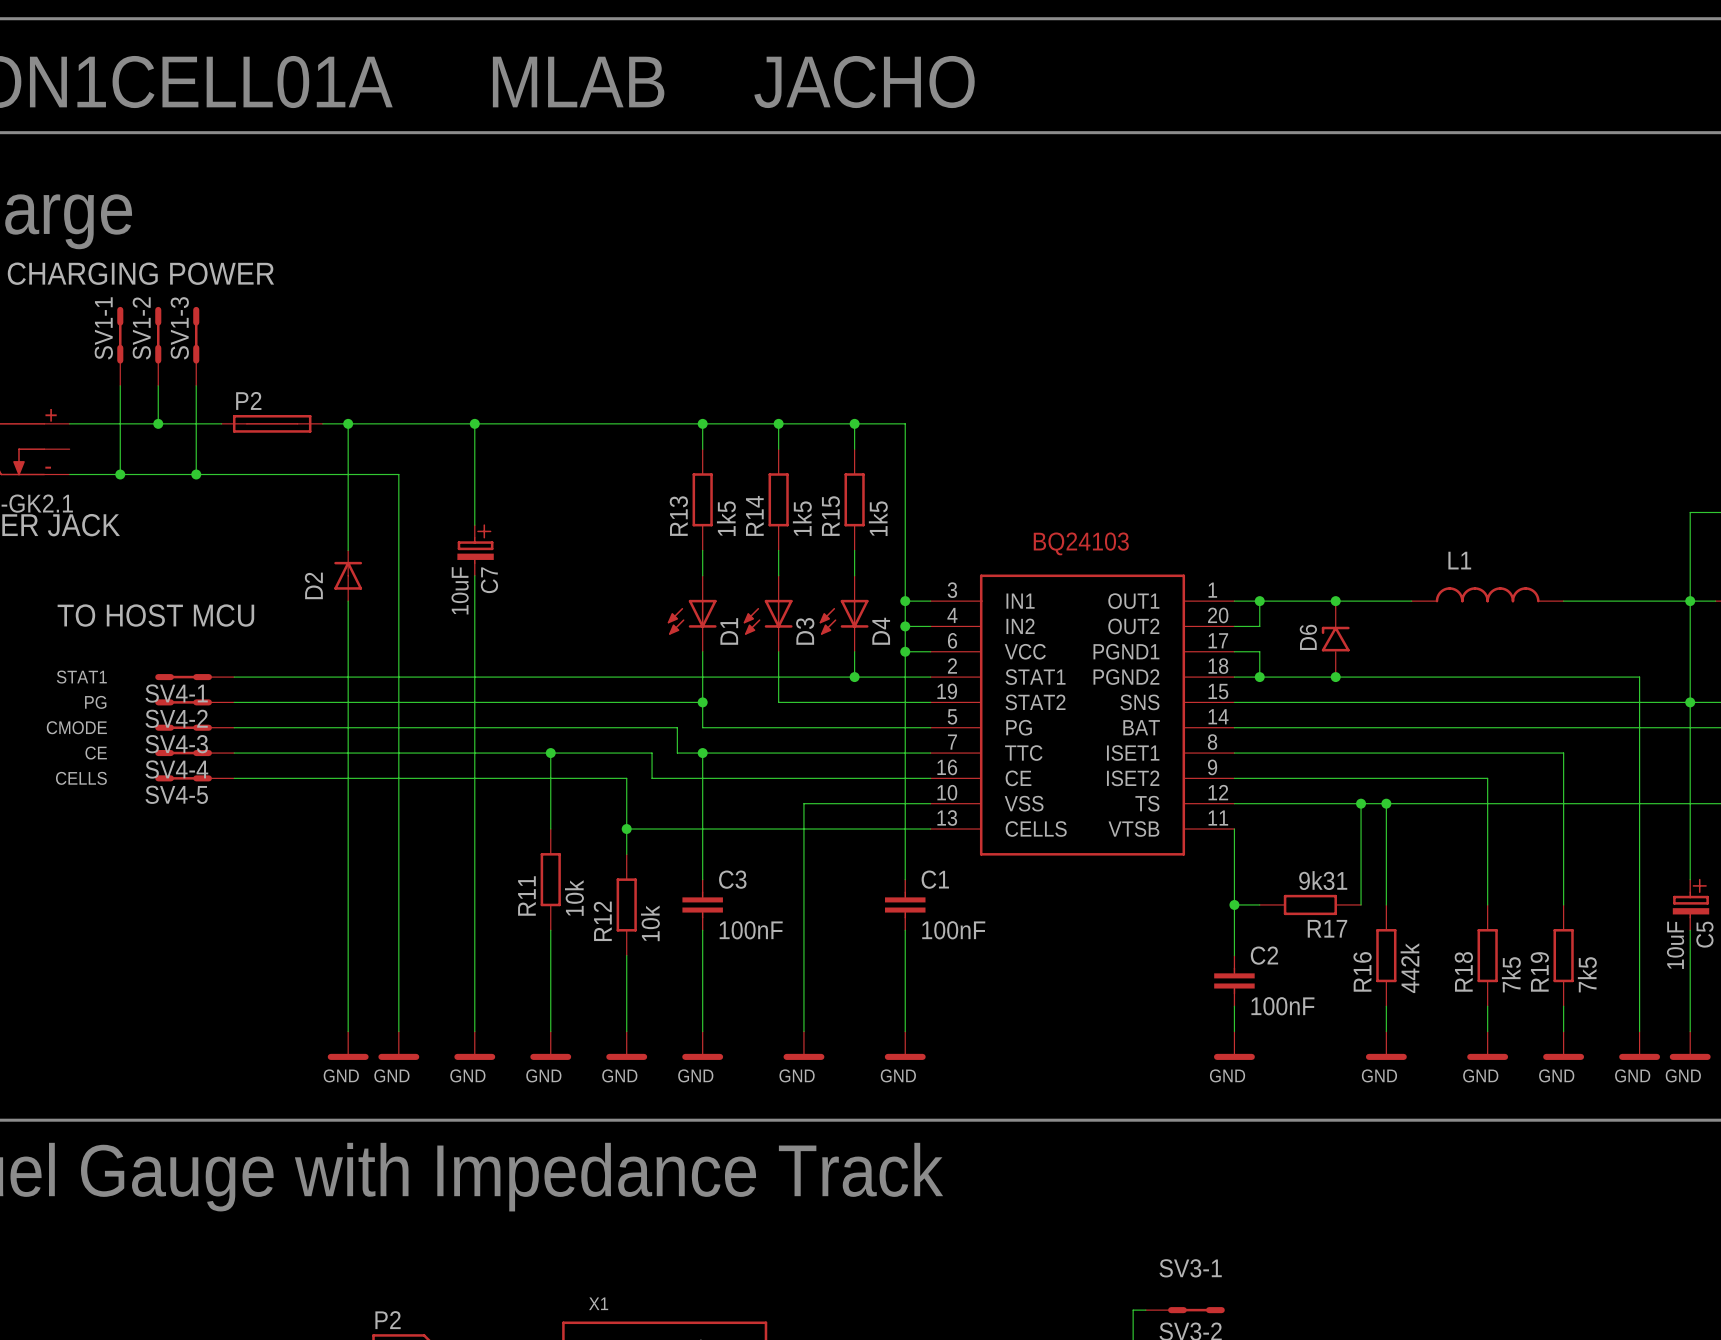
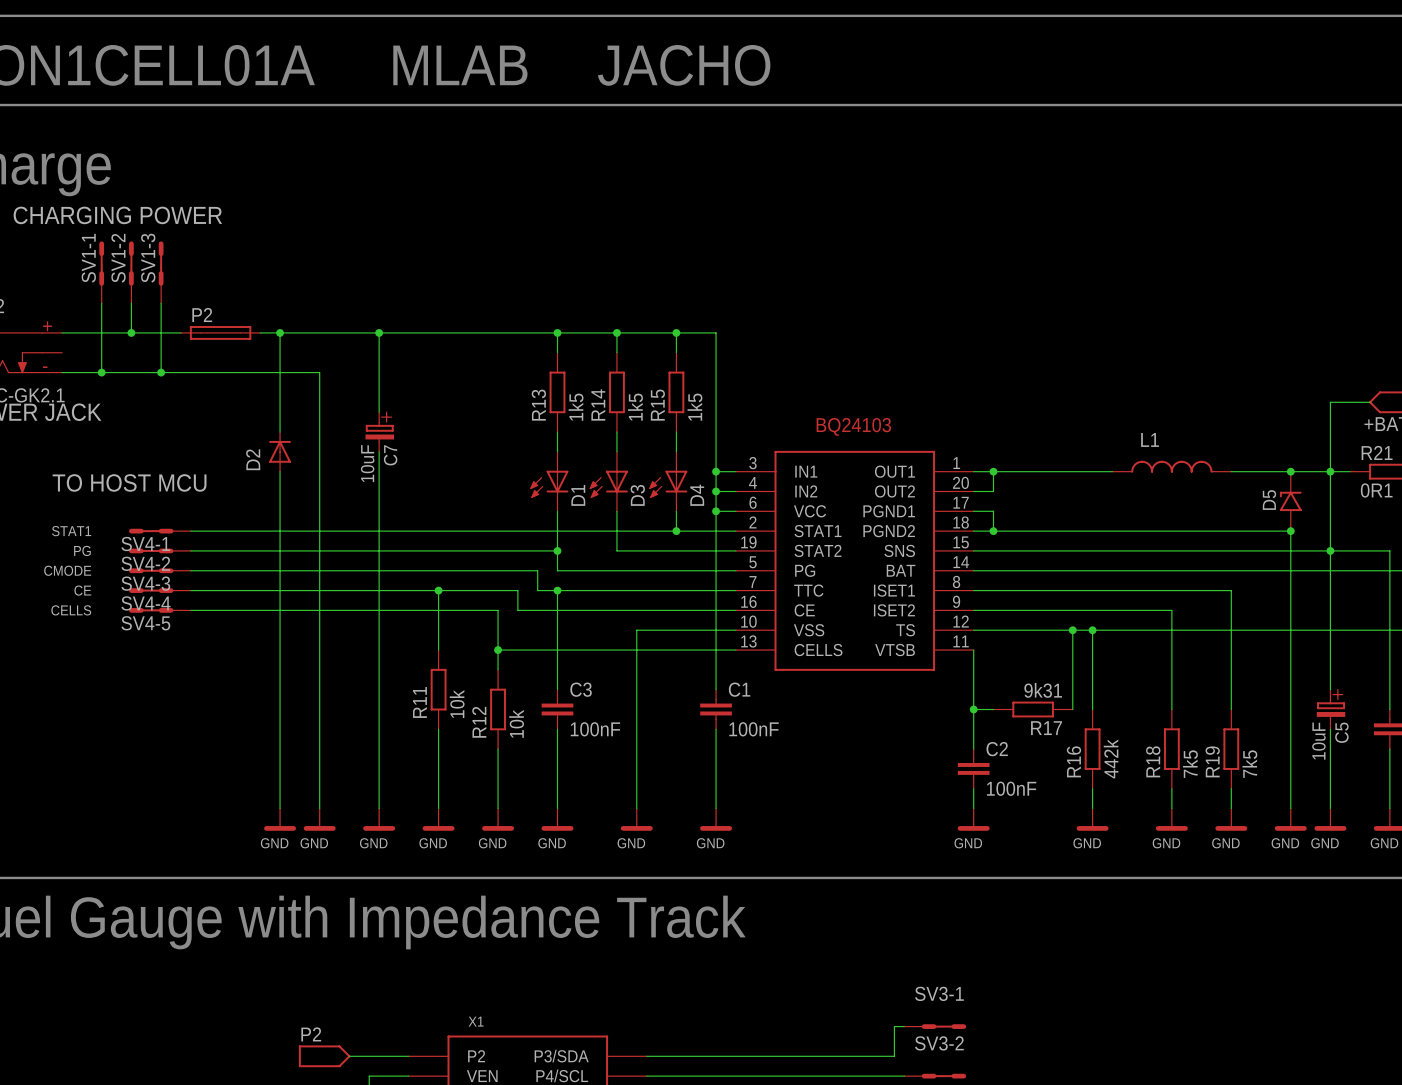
junction: (1335, 601) -> none
junction: none -> (1290, 471)
D6: (1335, 639) -> none
D5: none -> (1290, 501)
junction: (1335, 677) -> none
junction: none -> (1290, 531)

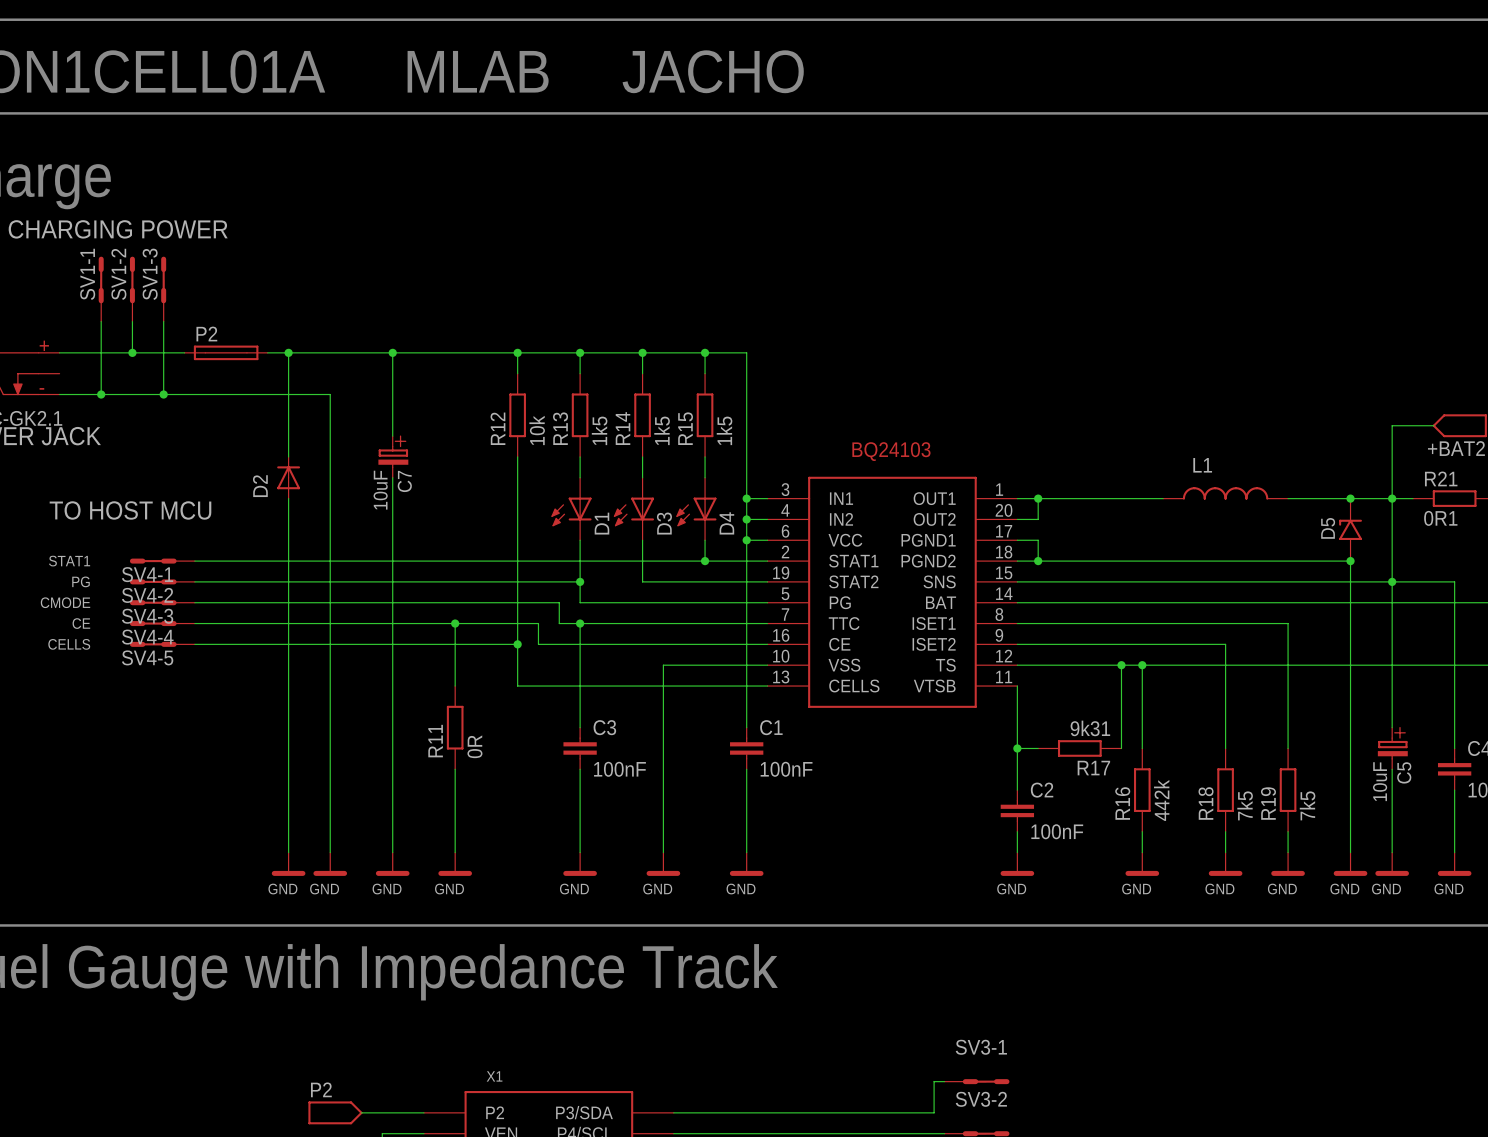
wire: none -> (517, 352) (517, 373)
junction: none -> (517, 352)
wire: none -> (517, 456) (517, 644)
wire: (498, 650) (498, 669) -> none
junction position: (498, 650) -> (517, 644)
R11 value: 10k (457, 704) -> 0R (474, 746)
R12 position: (498, 709) -> (517, 415)
wire: (498, 749) (498, 808) -> none
power symbol: (498, 819) -> none

